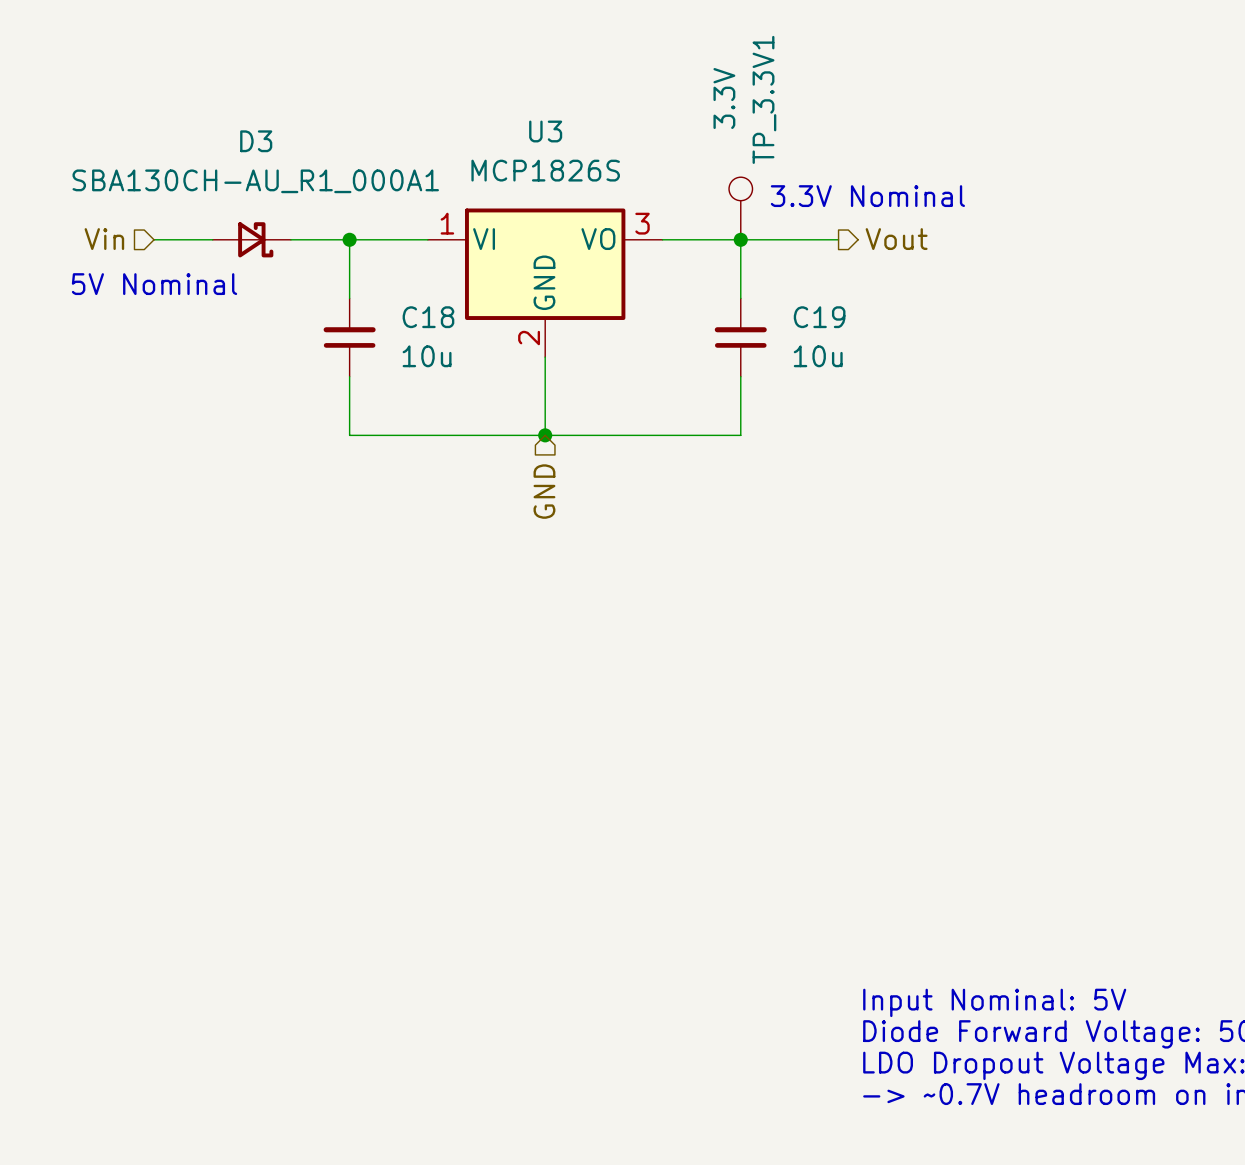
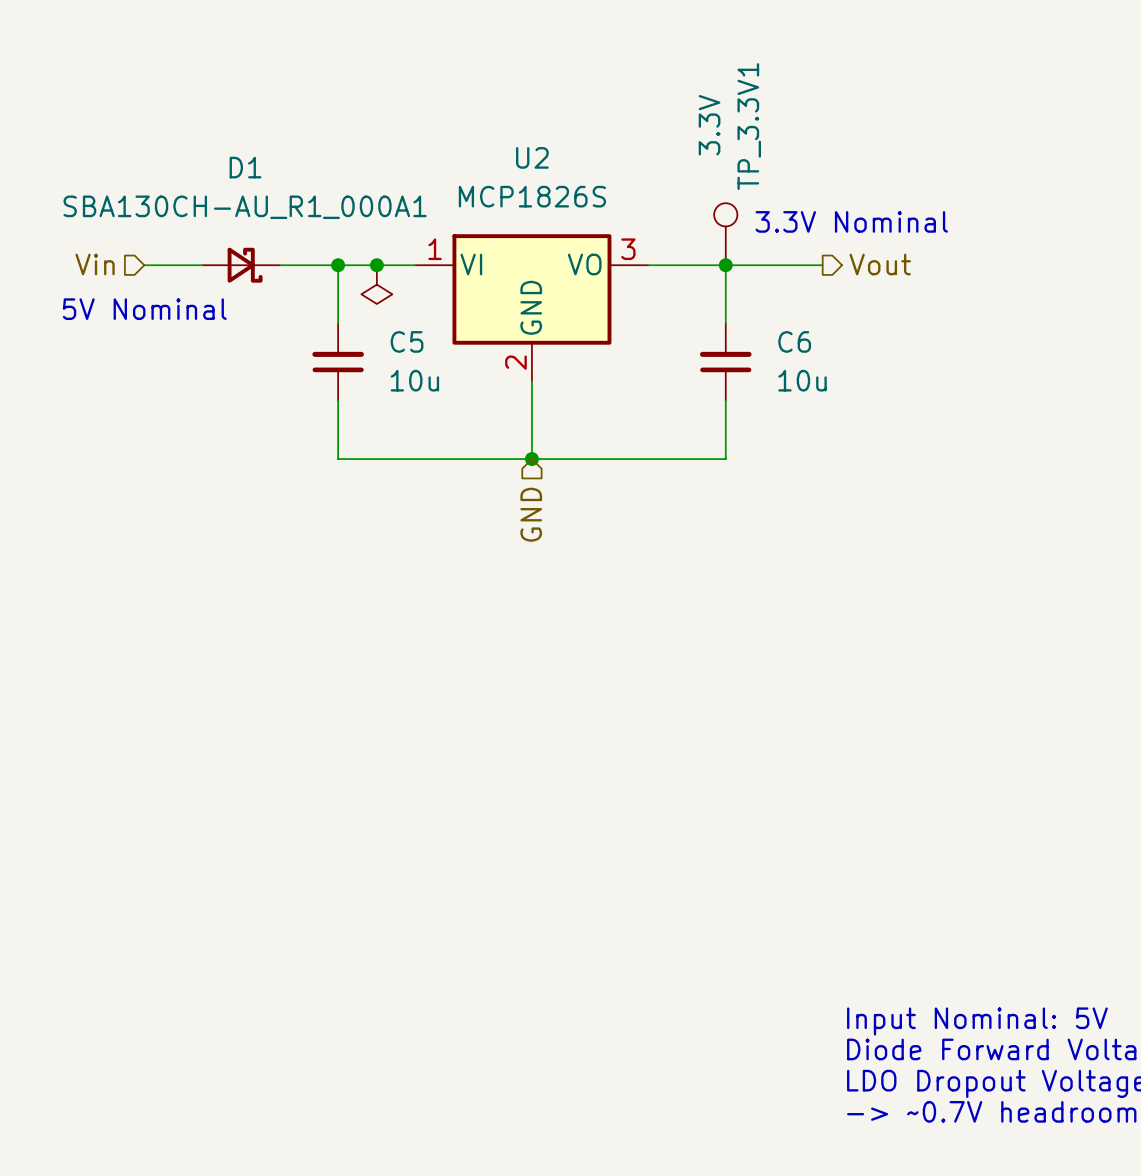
U3 name: U3 (545, 131) -> U2 (532, 157)
D3 name: D3 (256, 141) -> D1 (245, 167)
junction: none -> (376, 265)
power symbol: none -> (376, 284)
C18 name: C18 (428, 317) -> C5 (407, 341)
C19 name: C19 (819, 317) -> C6 (794, 341)

